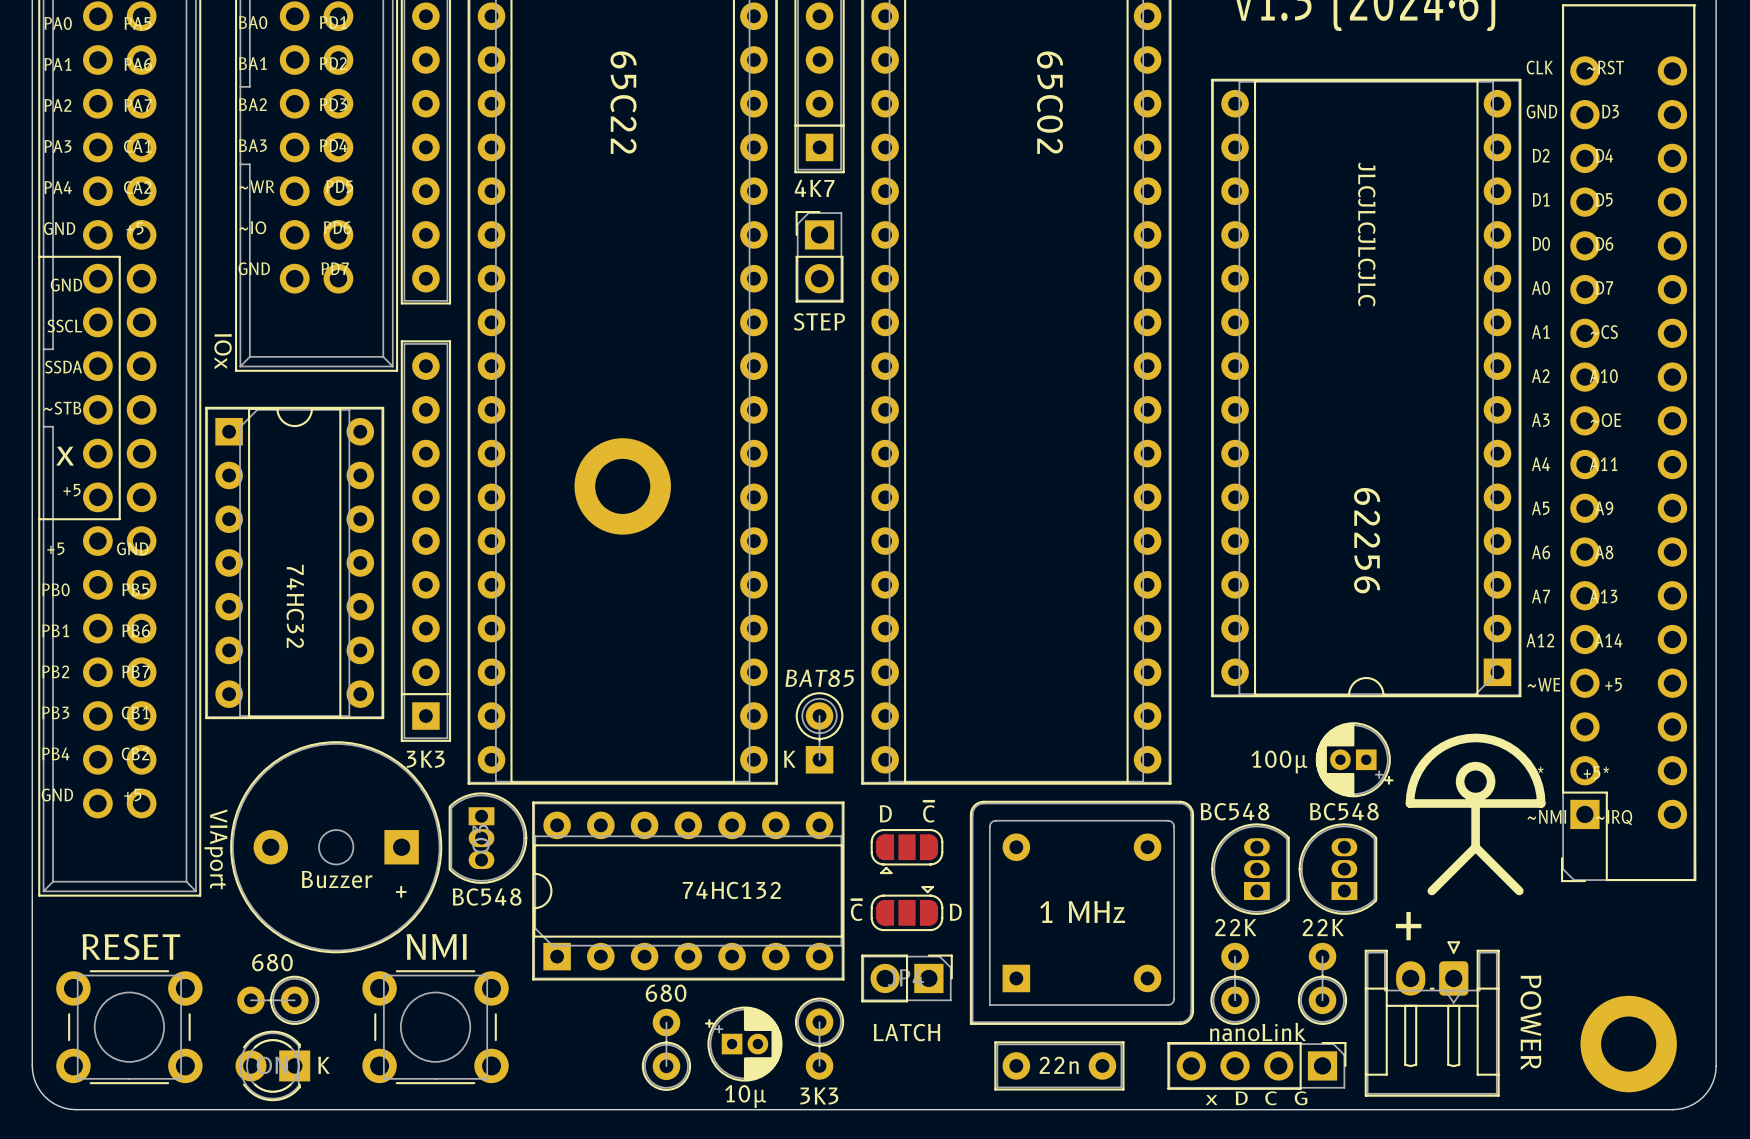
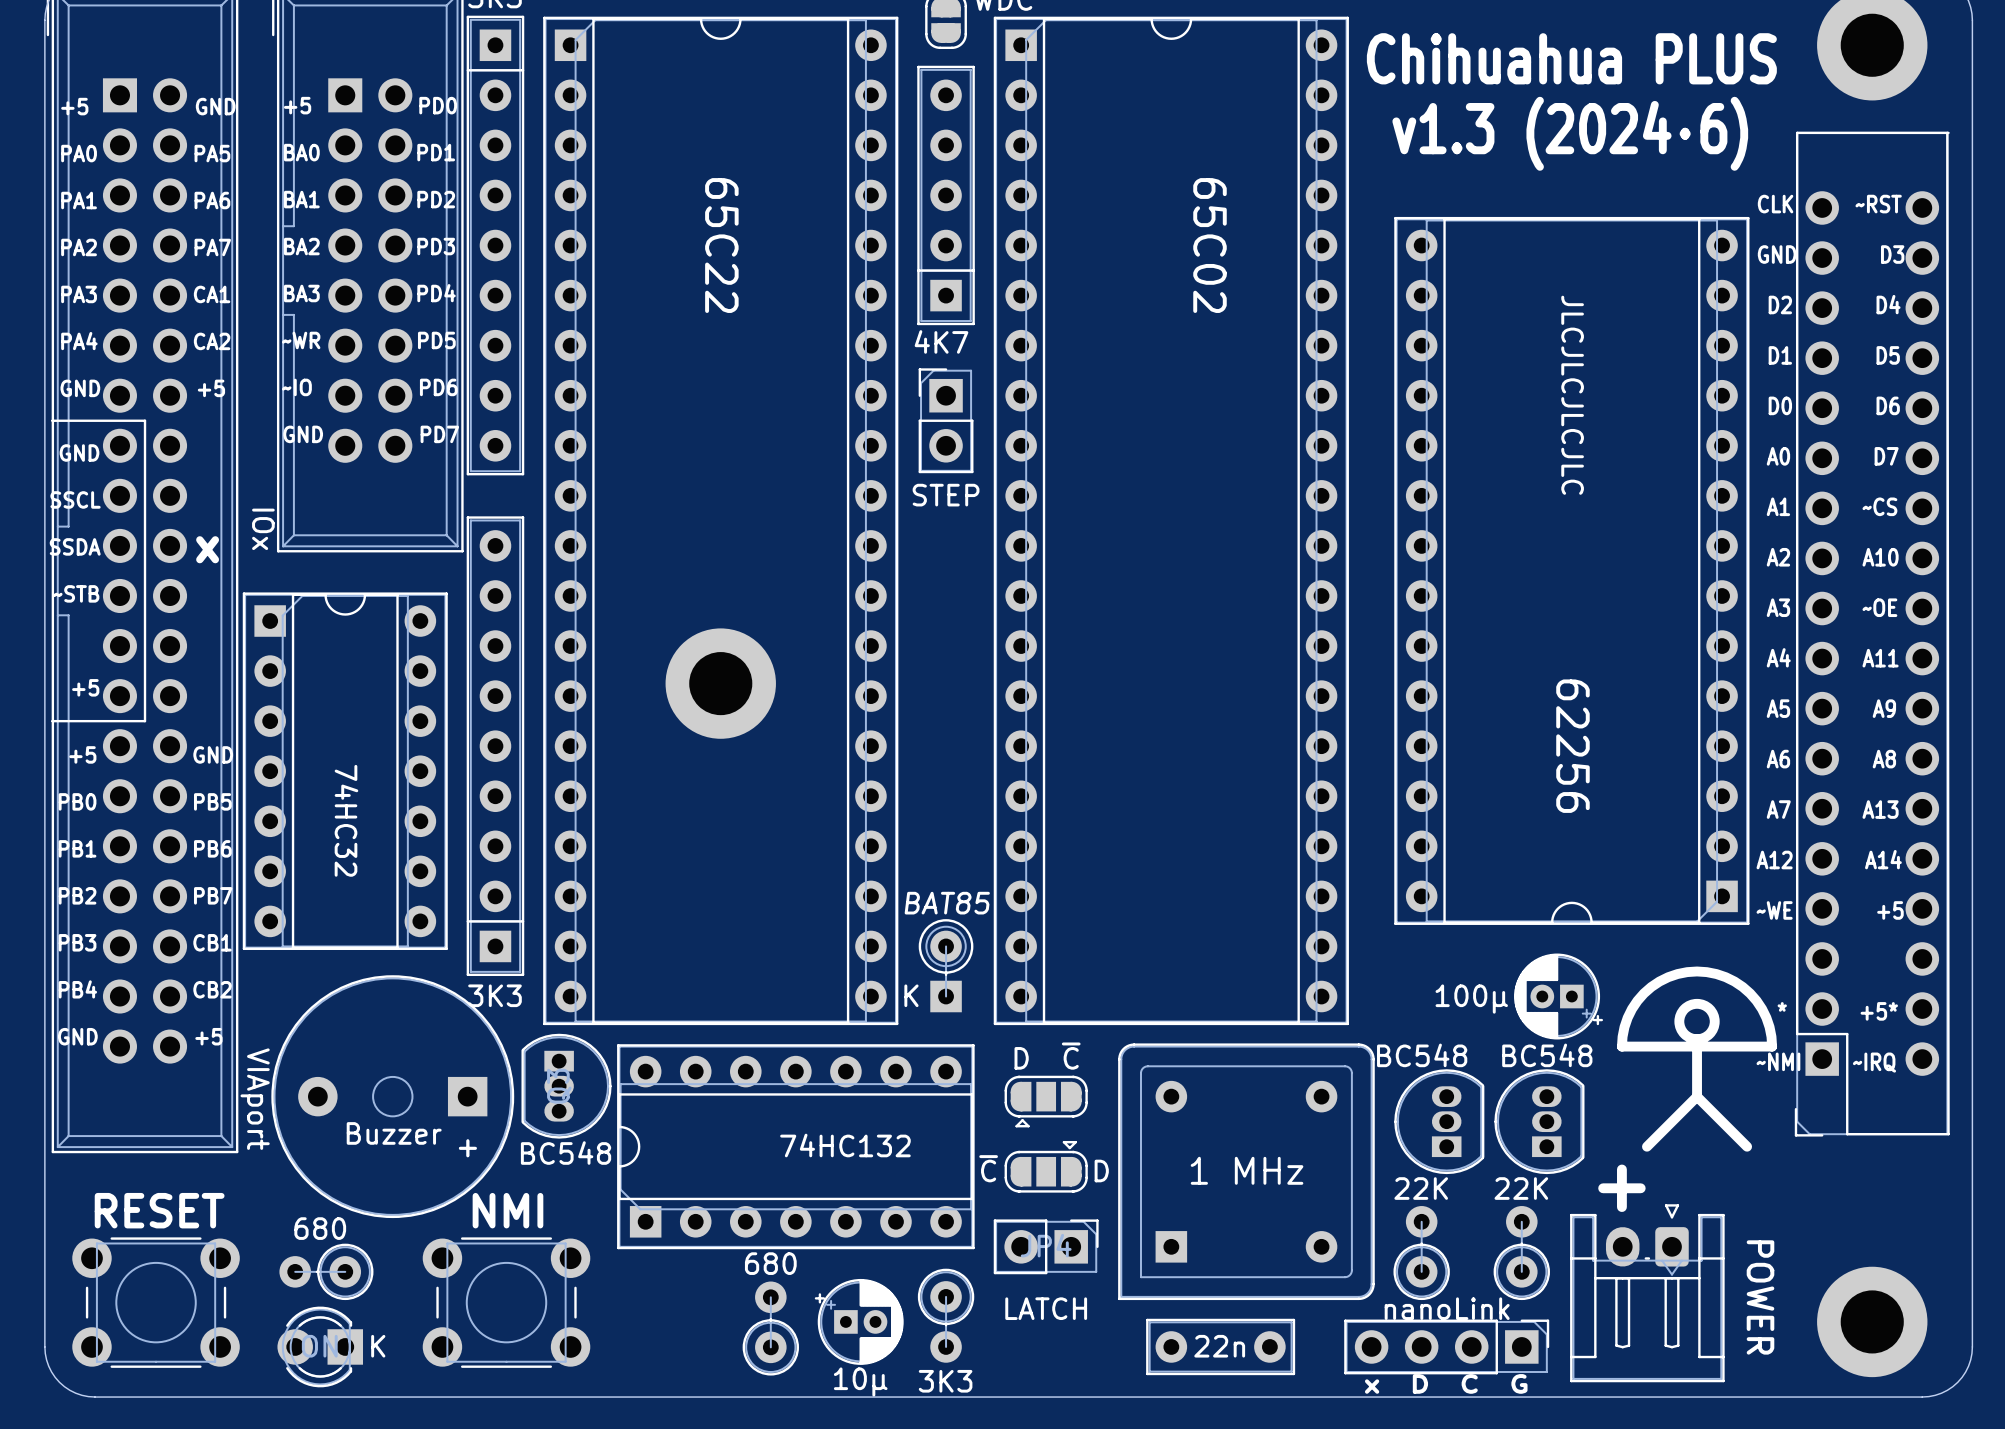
text position: x (65, 456) -> x (207, 549)

